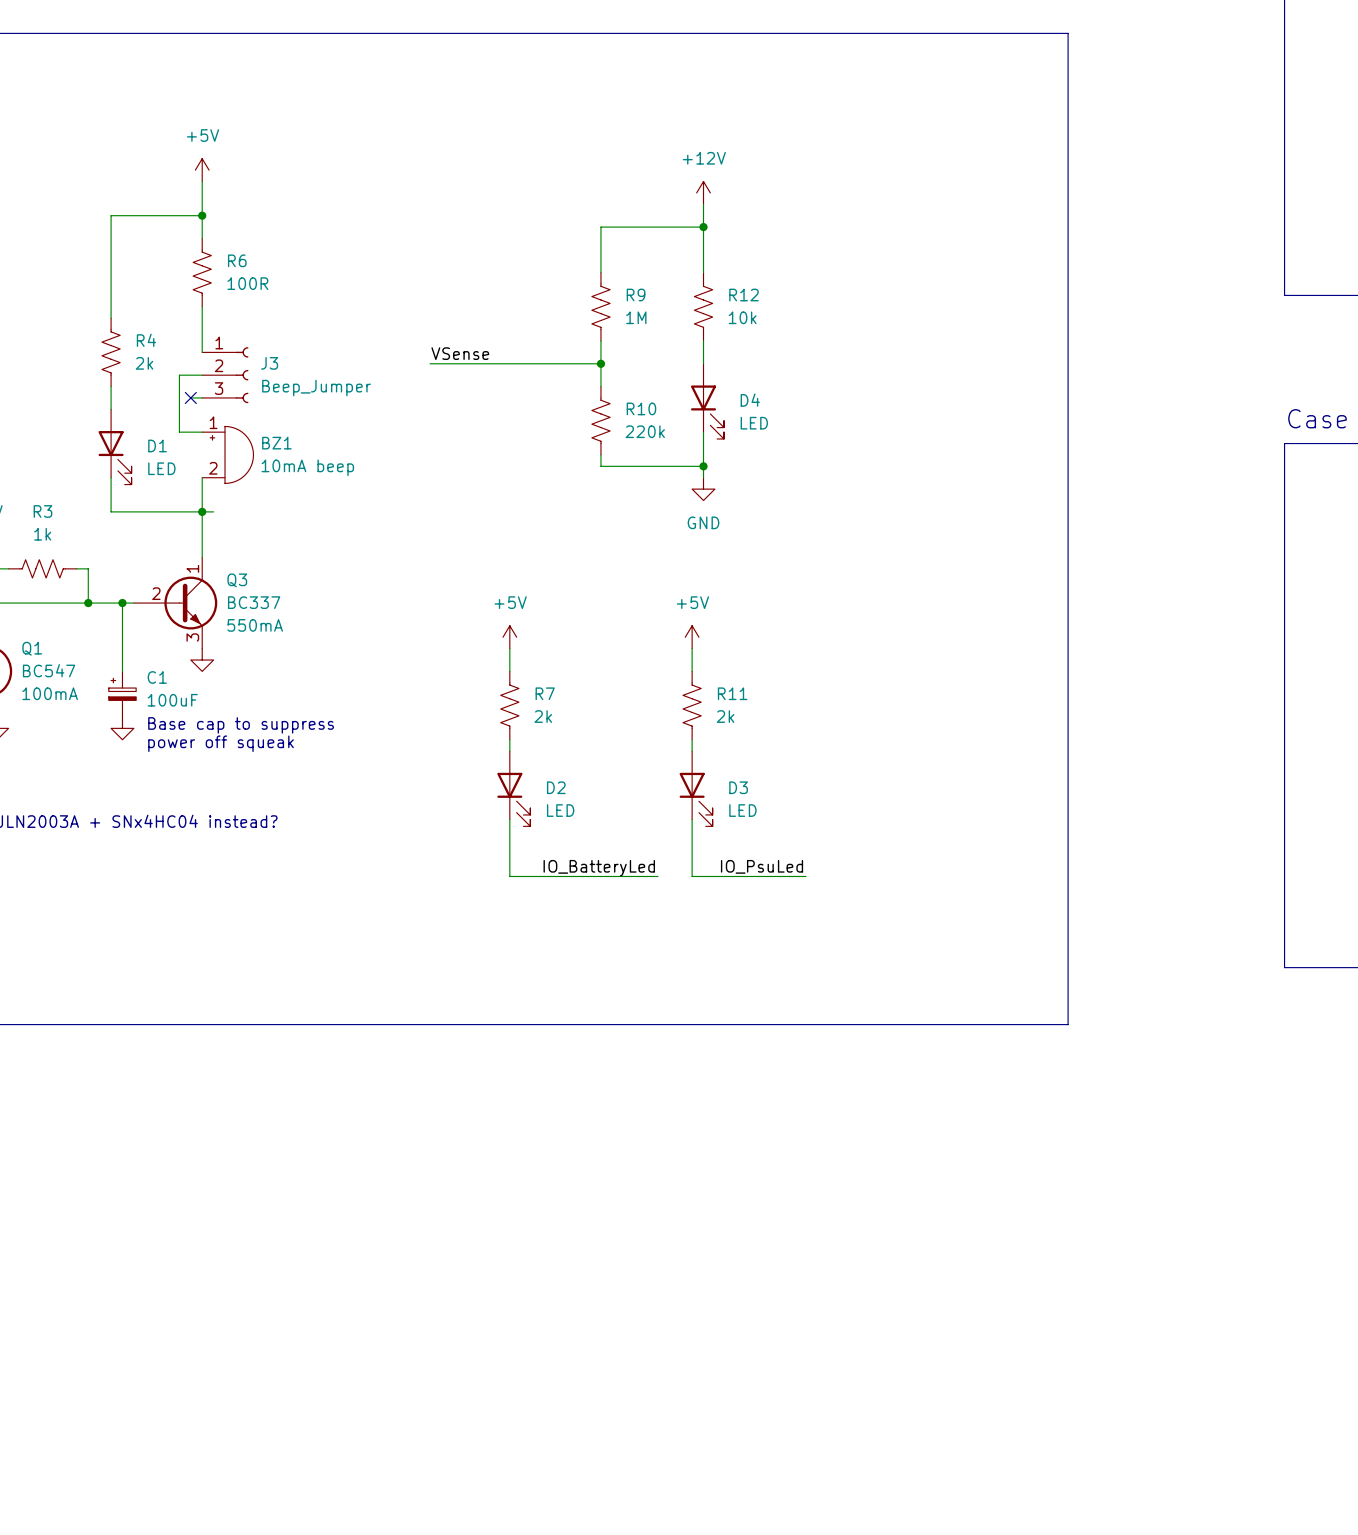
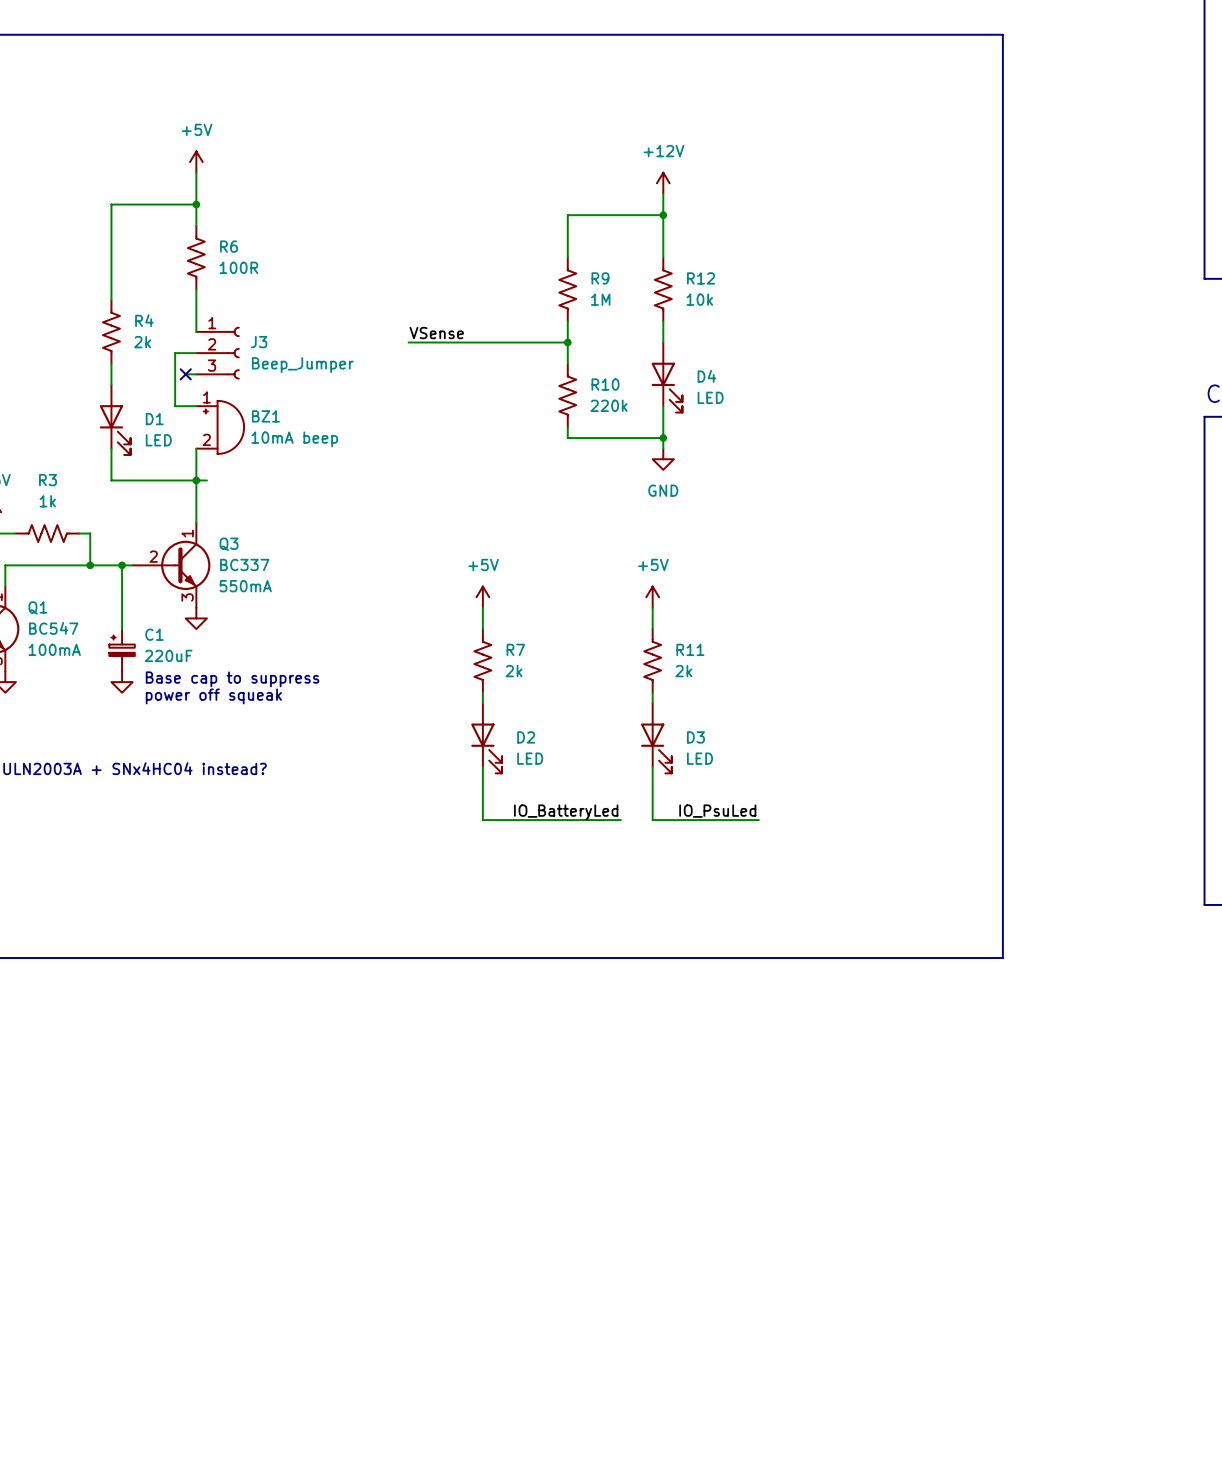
C1 value: 100uF (172, 700) -> 220uF (168, 655)

